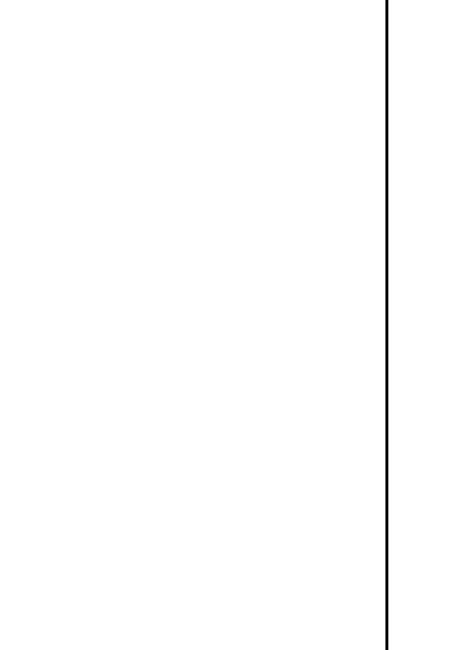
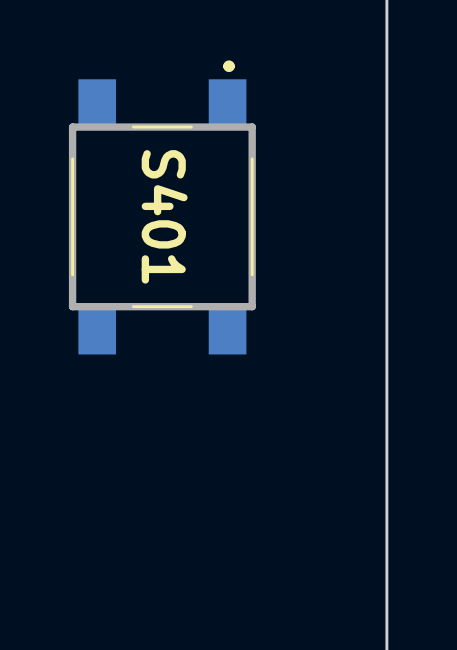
S401: none -> (162, 207)

